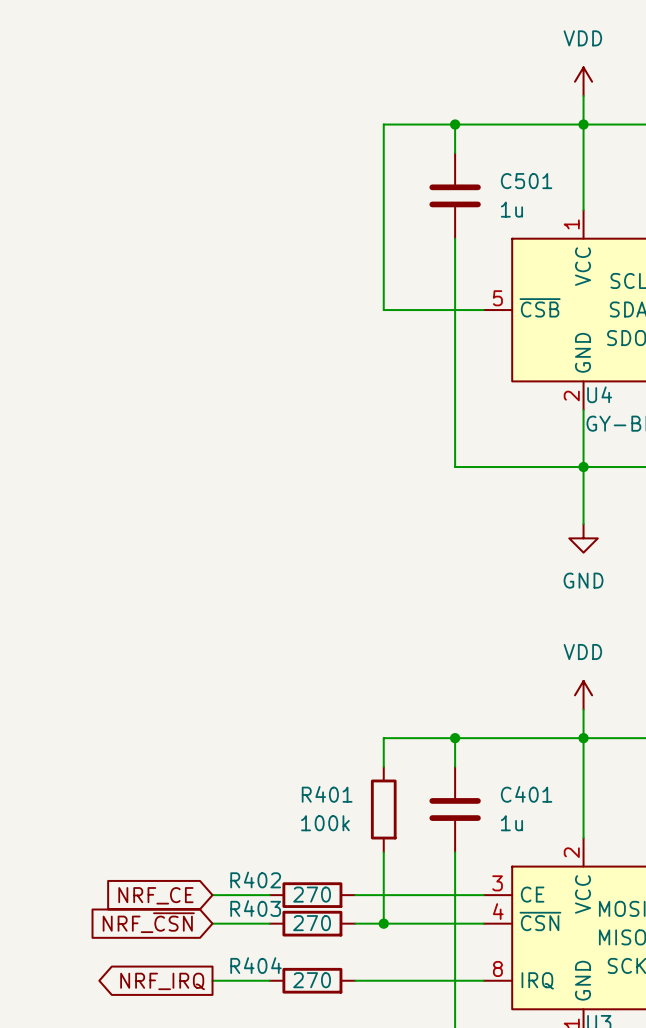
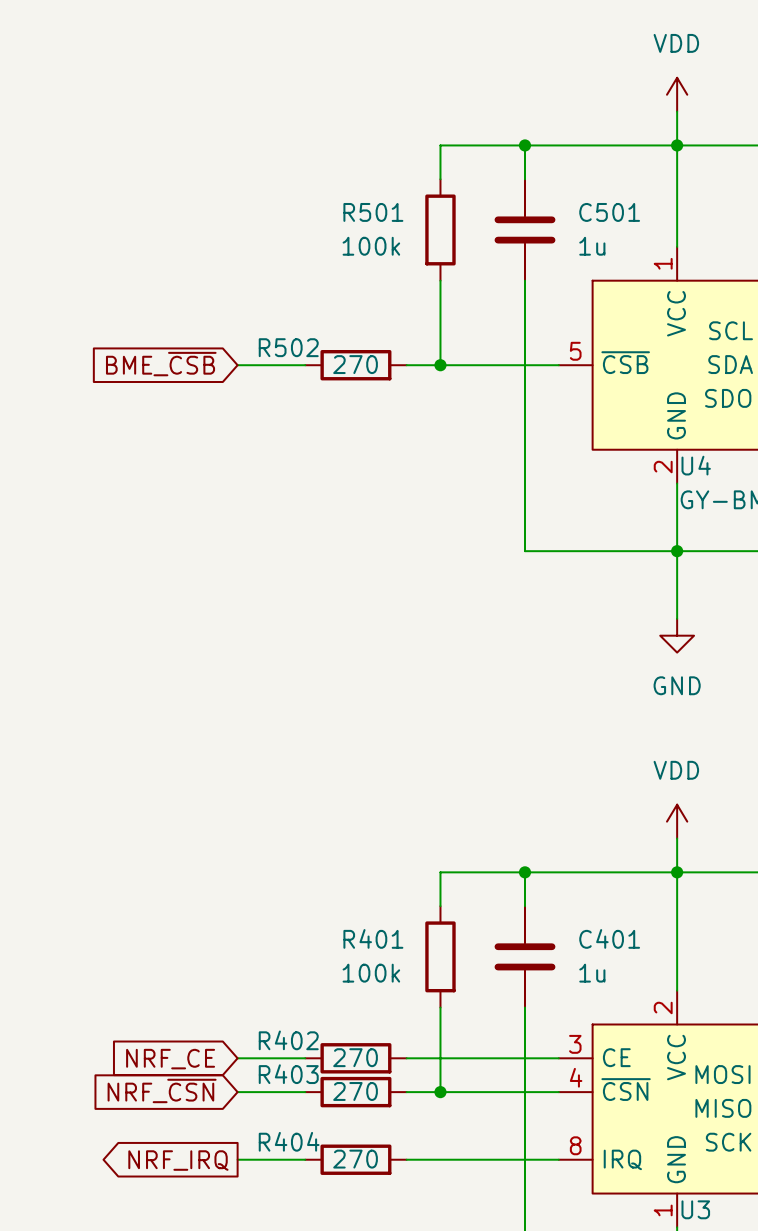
wire: (383, 153) (383, 238) -> none
R501: none -> 100k (440, 229)
global label: none -> BME_~{CSB} (161, 364)
wire: none -> (237, 365) (305, 365)
R502: none -> 270 (355, 365)
wire: none -> (406, 365) (440, 365)
junction: none -> (440, 365)

